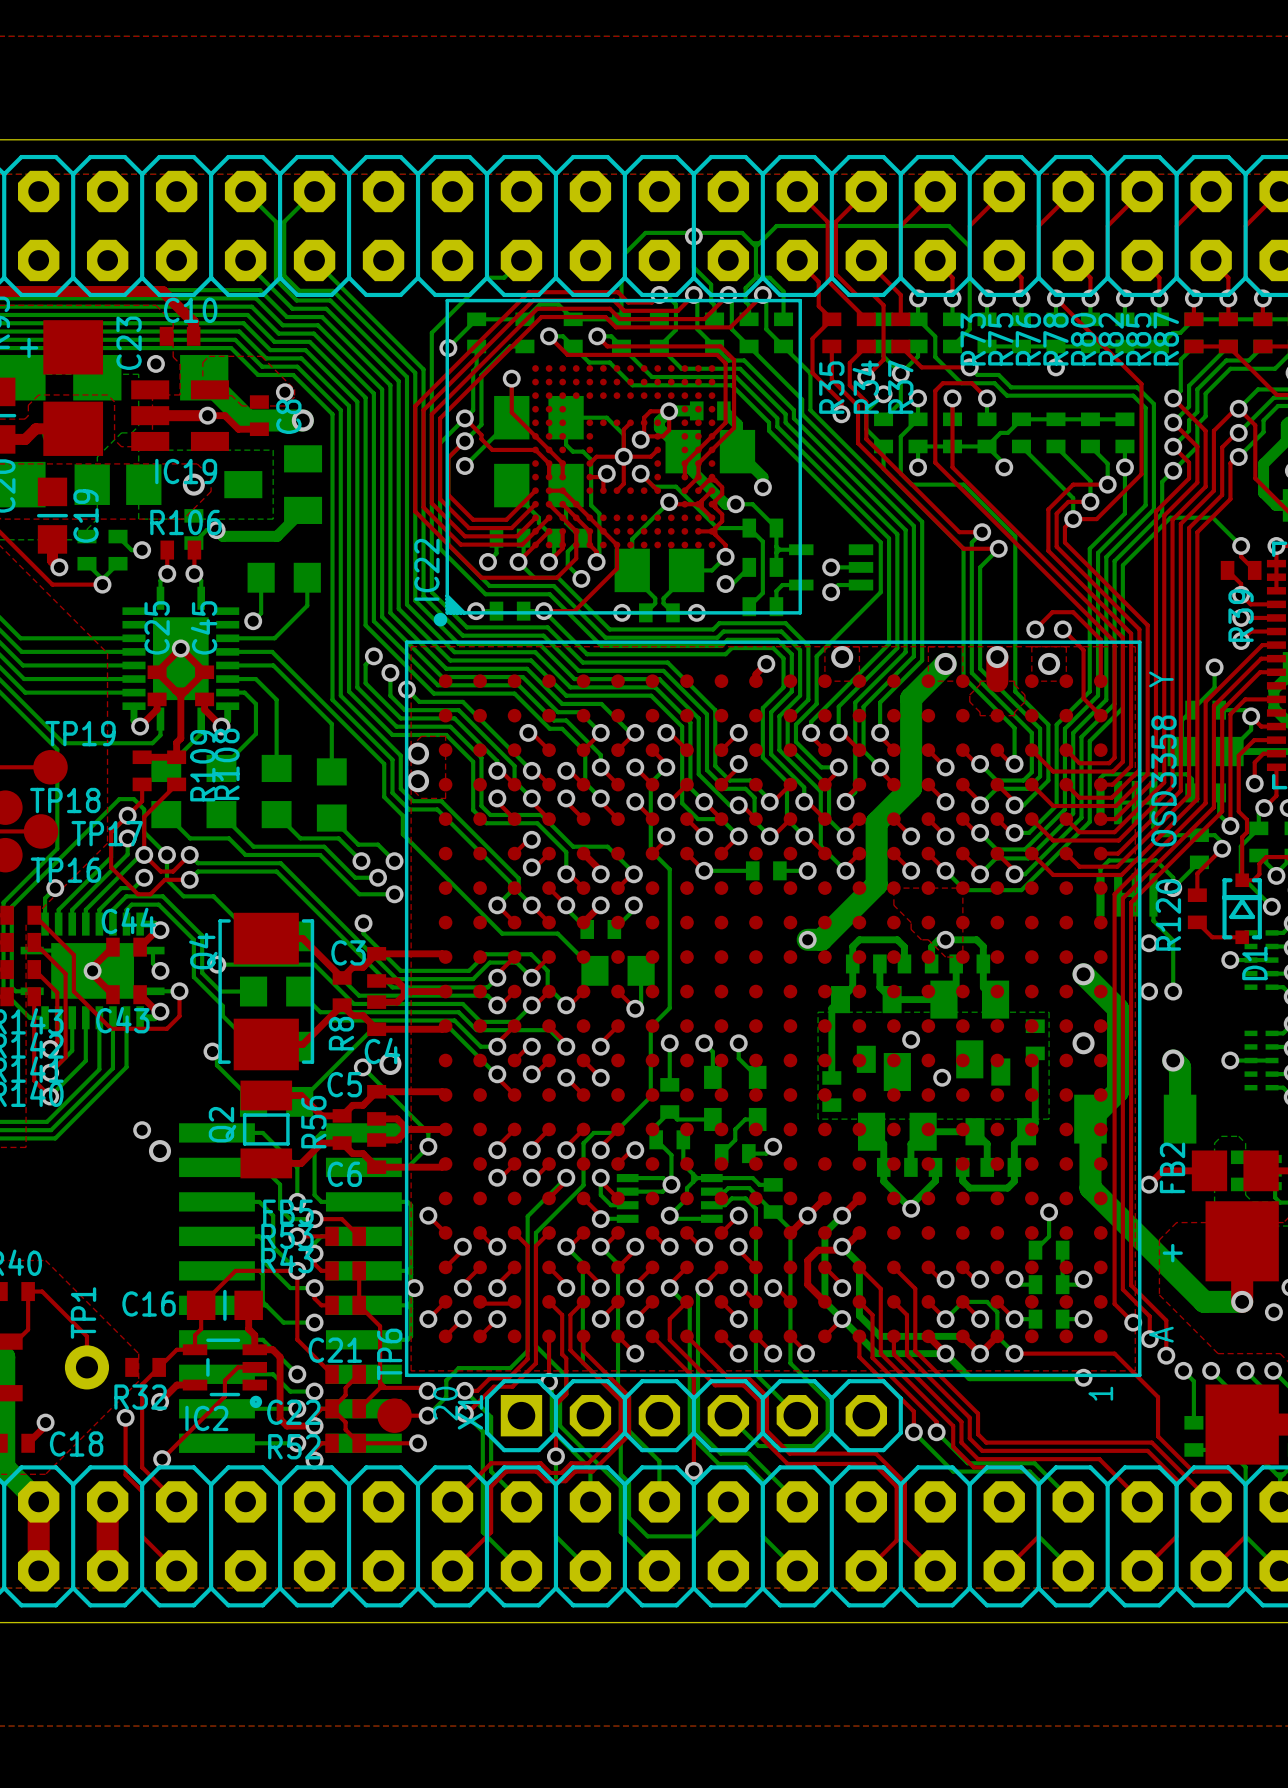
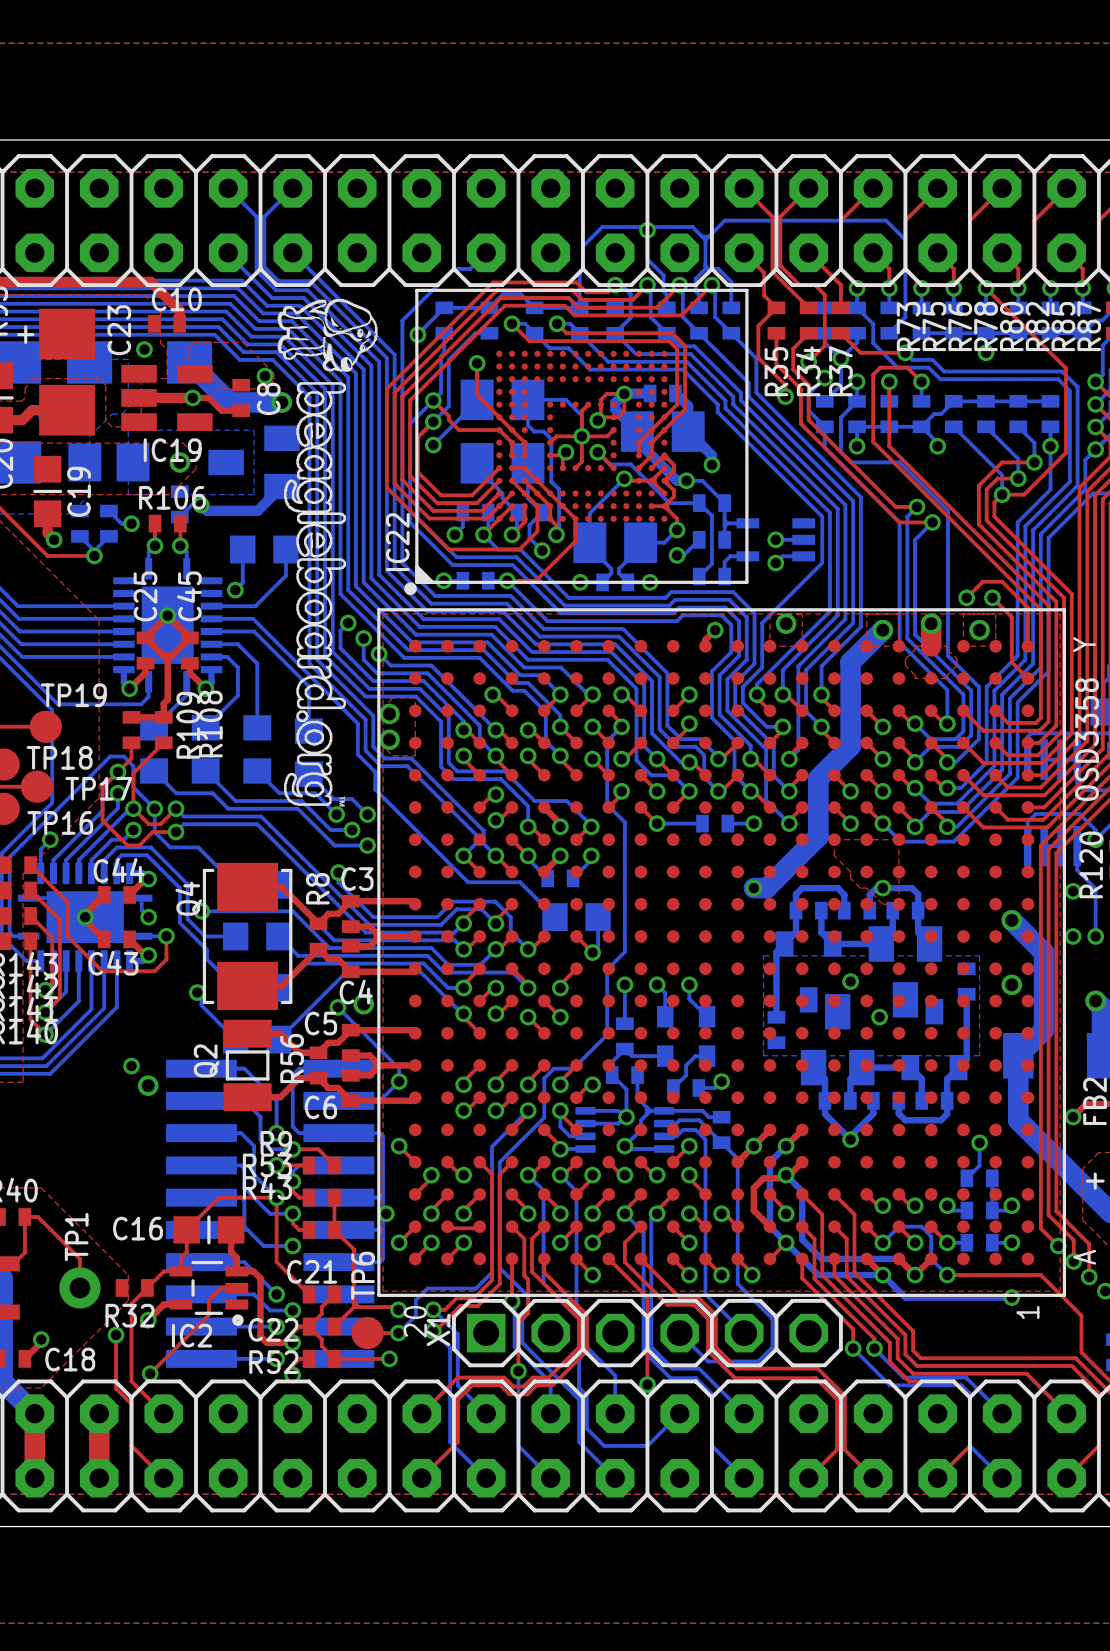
drawing: none -> [277, 298, 378, 807]
C3 name position: C3 (348, 952) -> C3 (357, 879)
R8 name position: R8 (341, 1033) -> R8 (317, 888)
FB5 name: FB5 (288, 1212) -> R9 (276, 1142)

